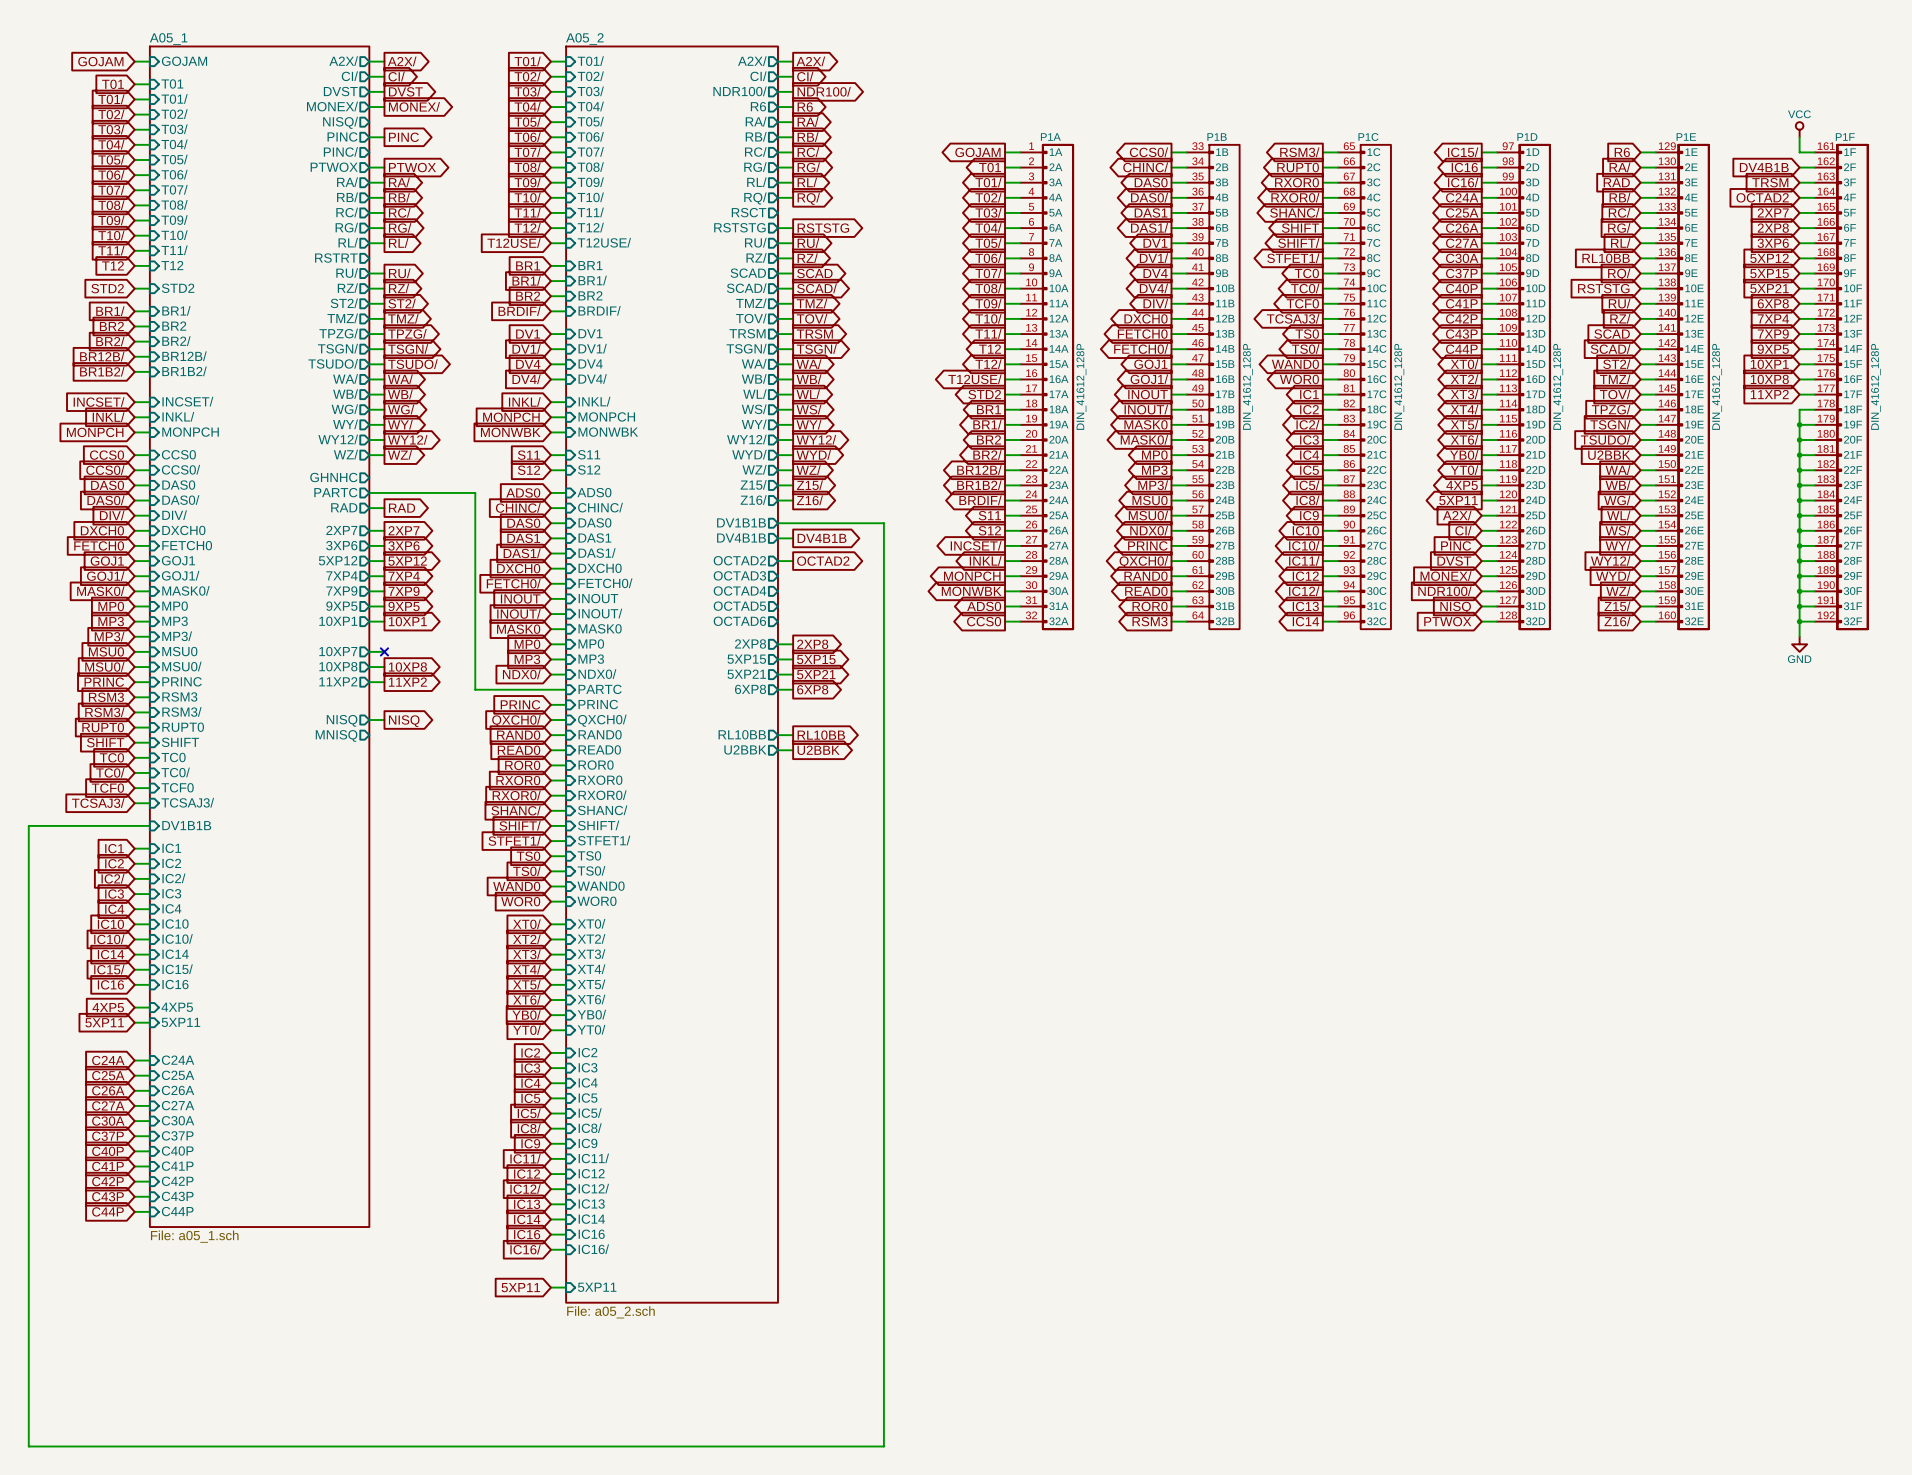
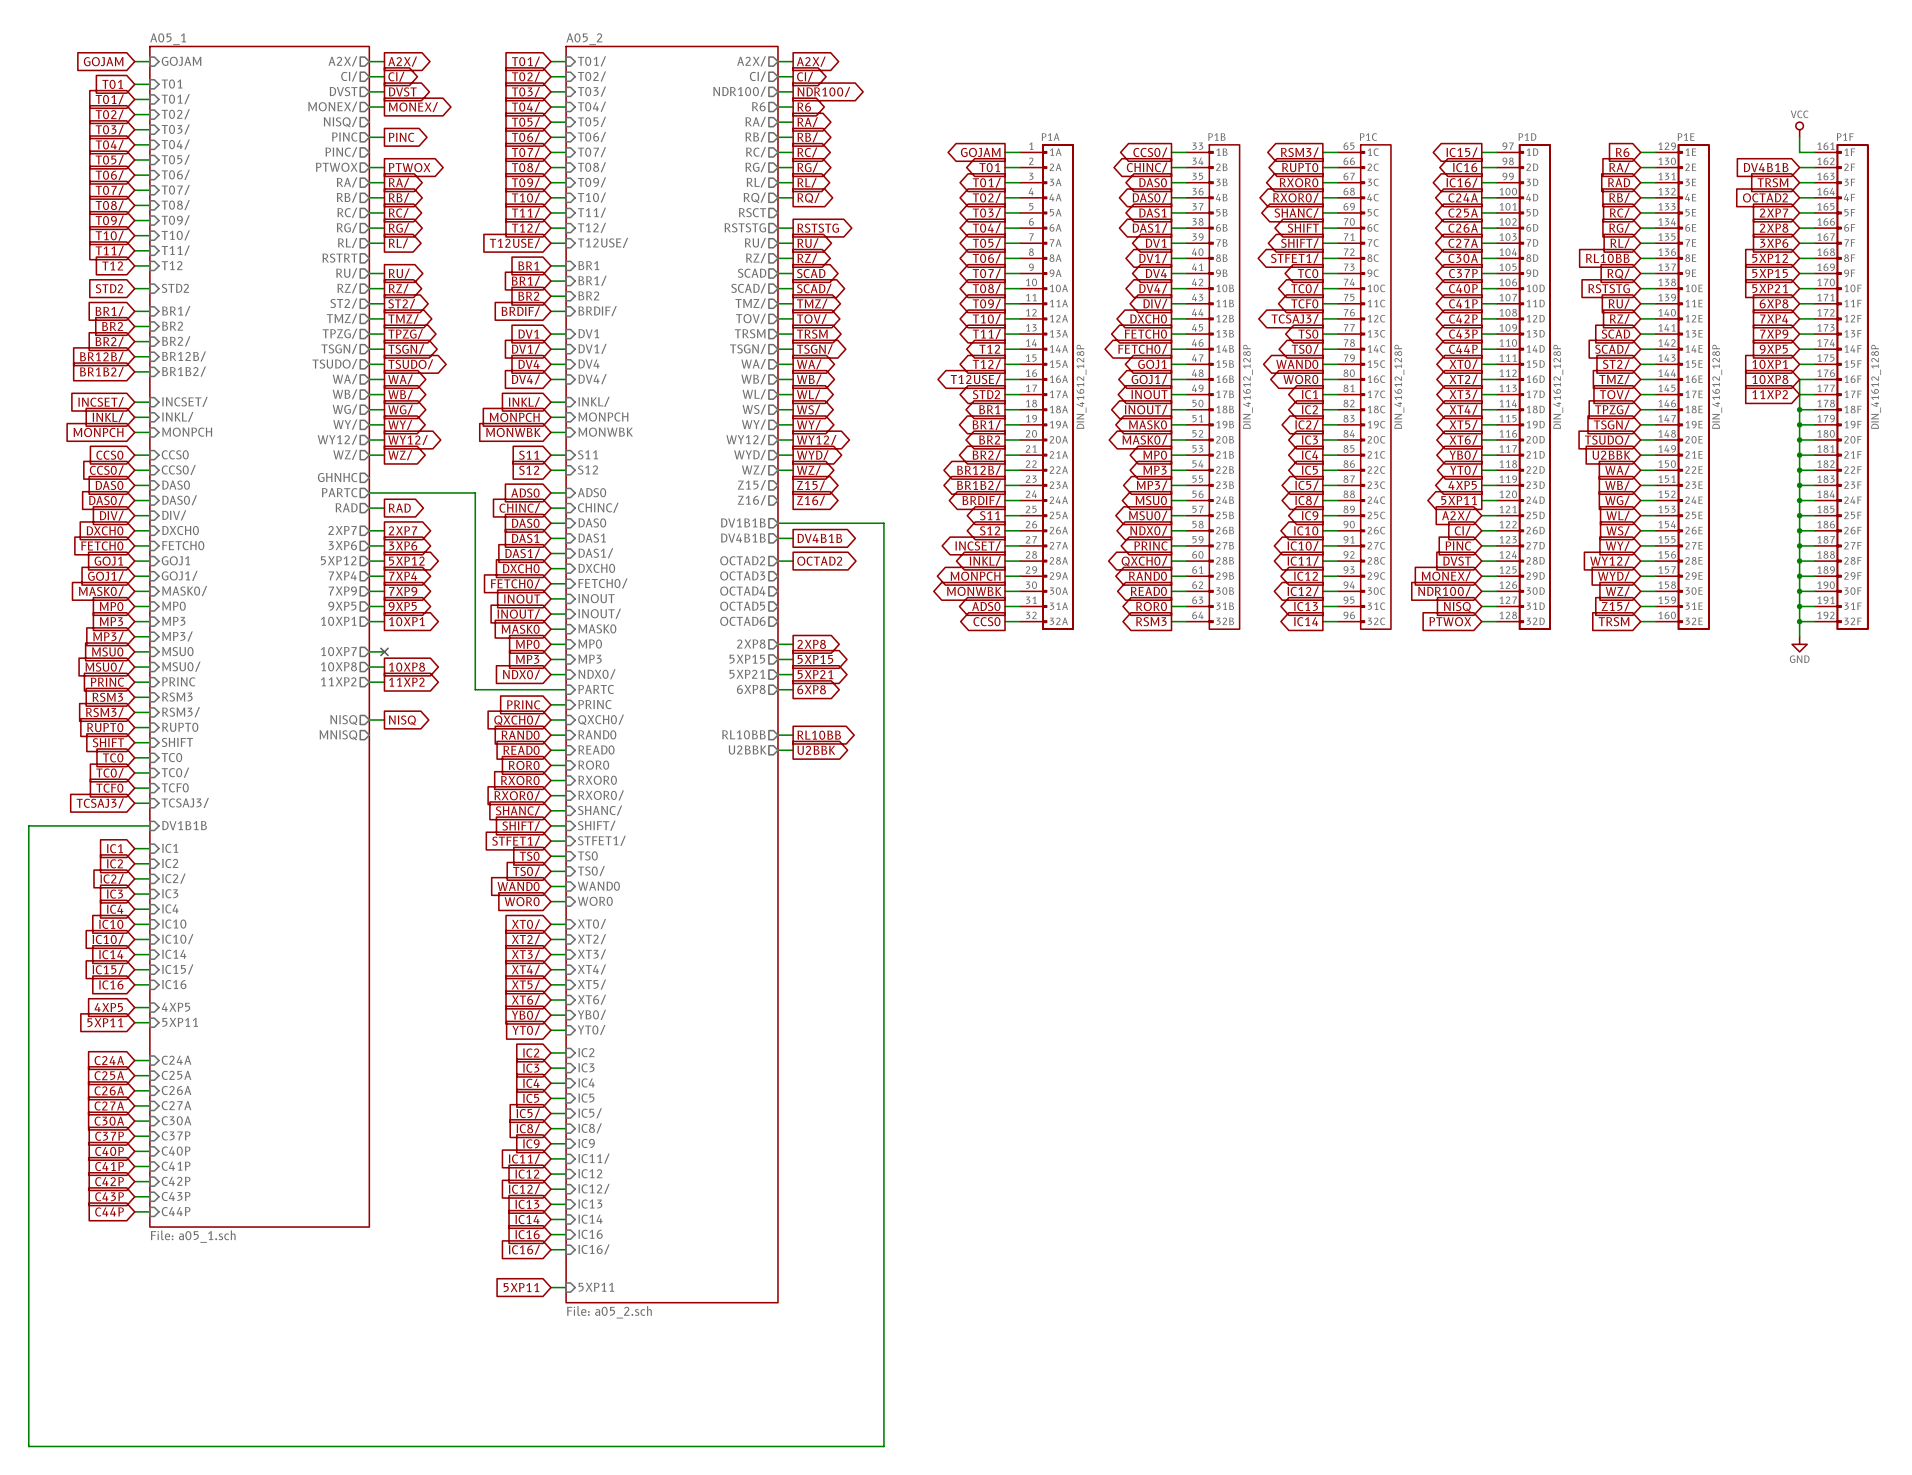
wire: none -> (1799, 379) (1799, 409)
junction: none -> (1799, 409)
wire: (777, 485) (793, 485) -> none
wire: (777, 500) (793, 500) -> none
global label: Z16/ (1617, 621) -> TRSM (1614, 621)

